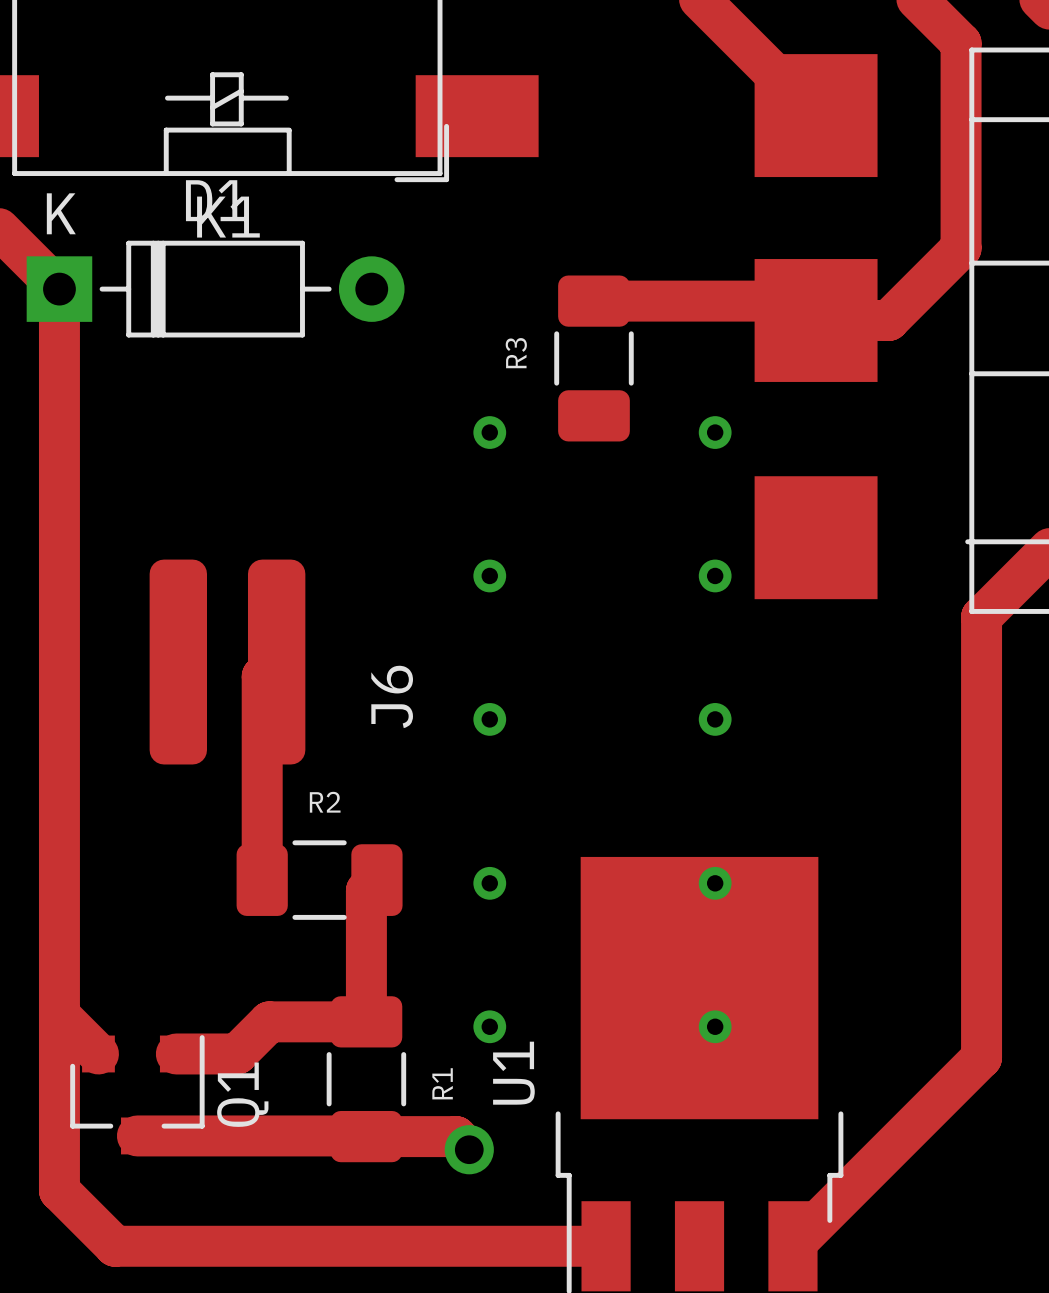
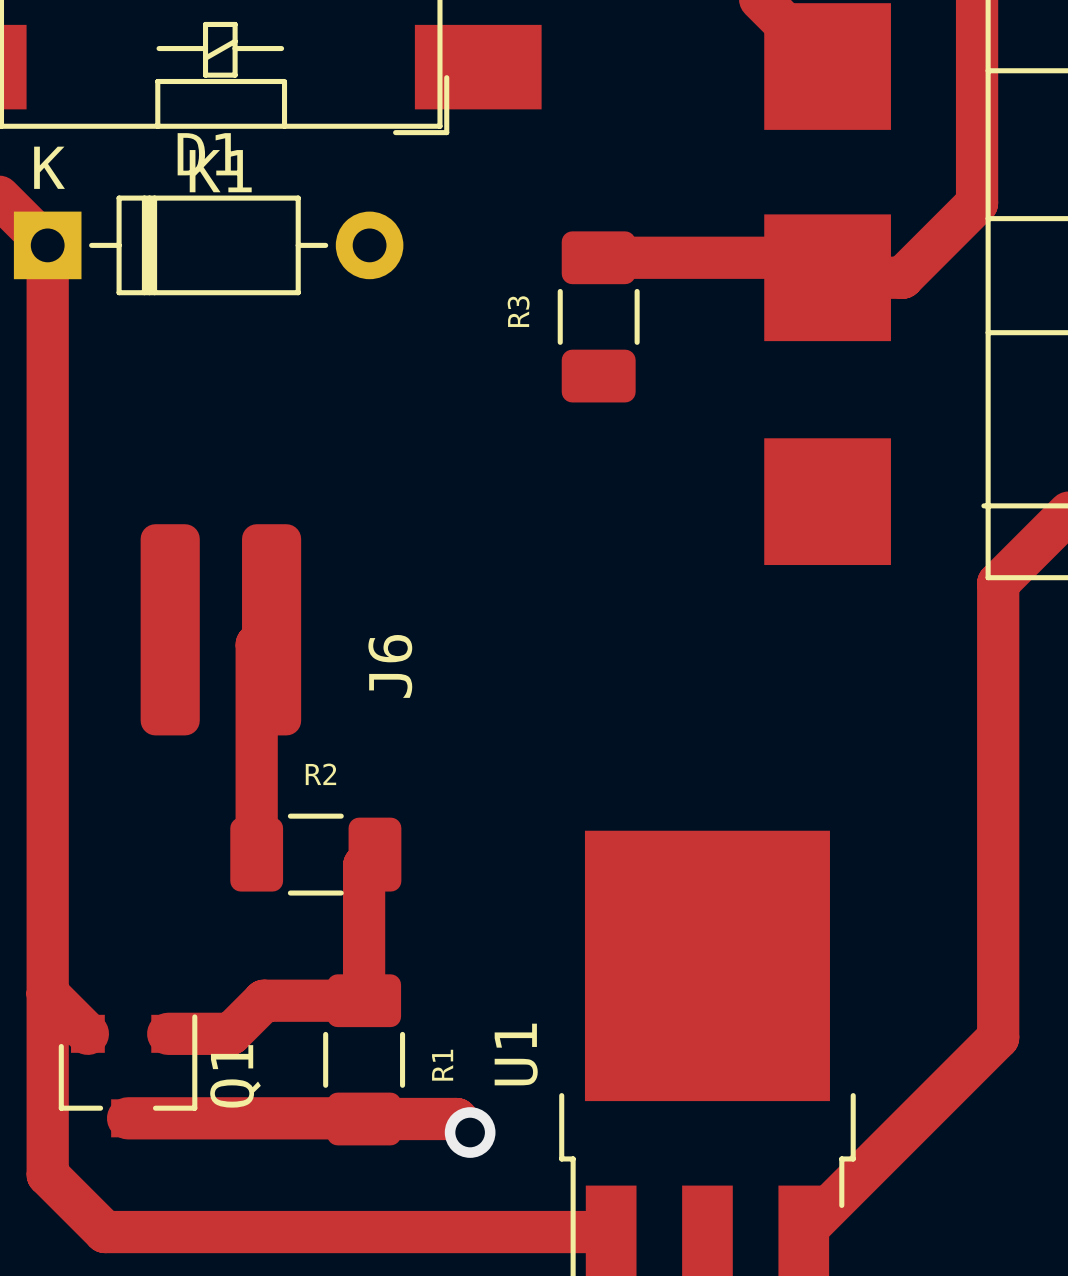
via: (489, 432) -> none
via: (715, 432) -> none
via: (489, 575) -> none
via: (715, 575) -> none
via: (489, 719) -> none
via: (715, 719) -> none
via: (489, 883) -> none
via: (715, 883) -> none
via: (489, 1026) -> none
via: (715, 1026) -> none

